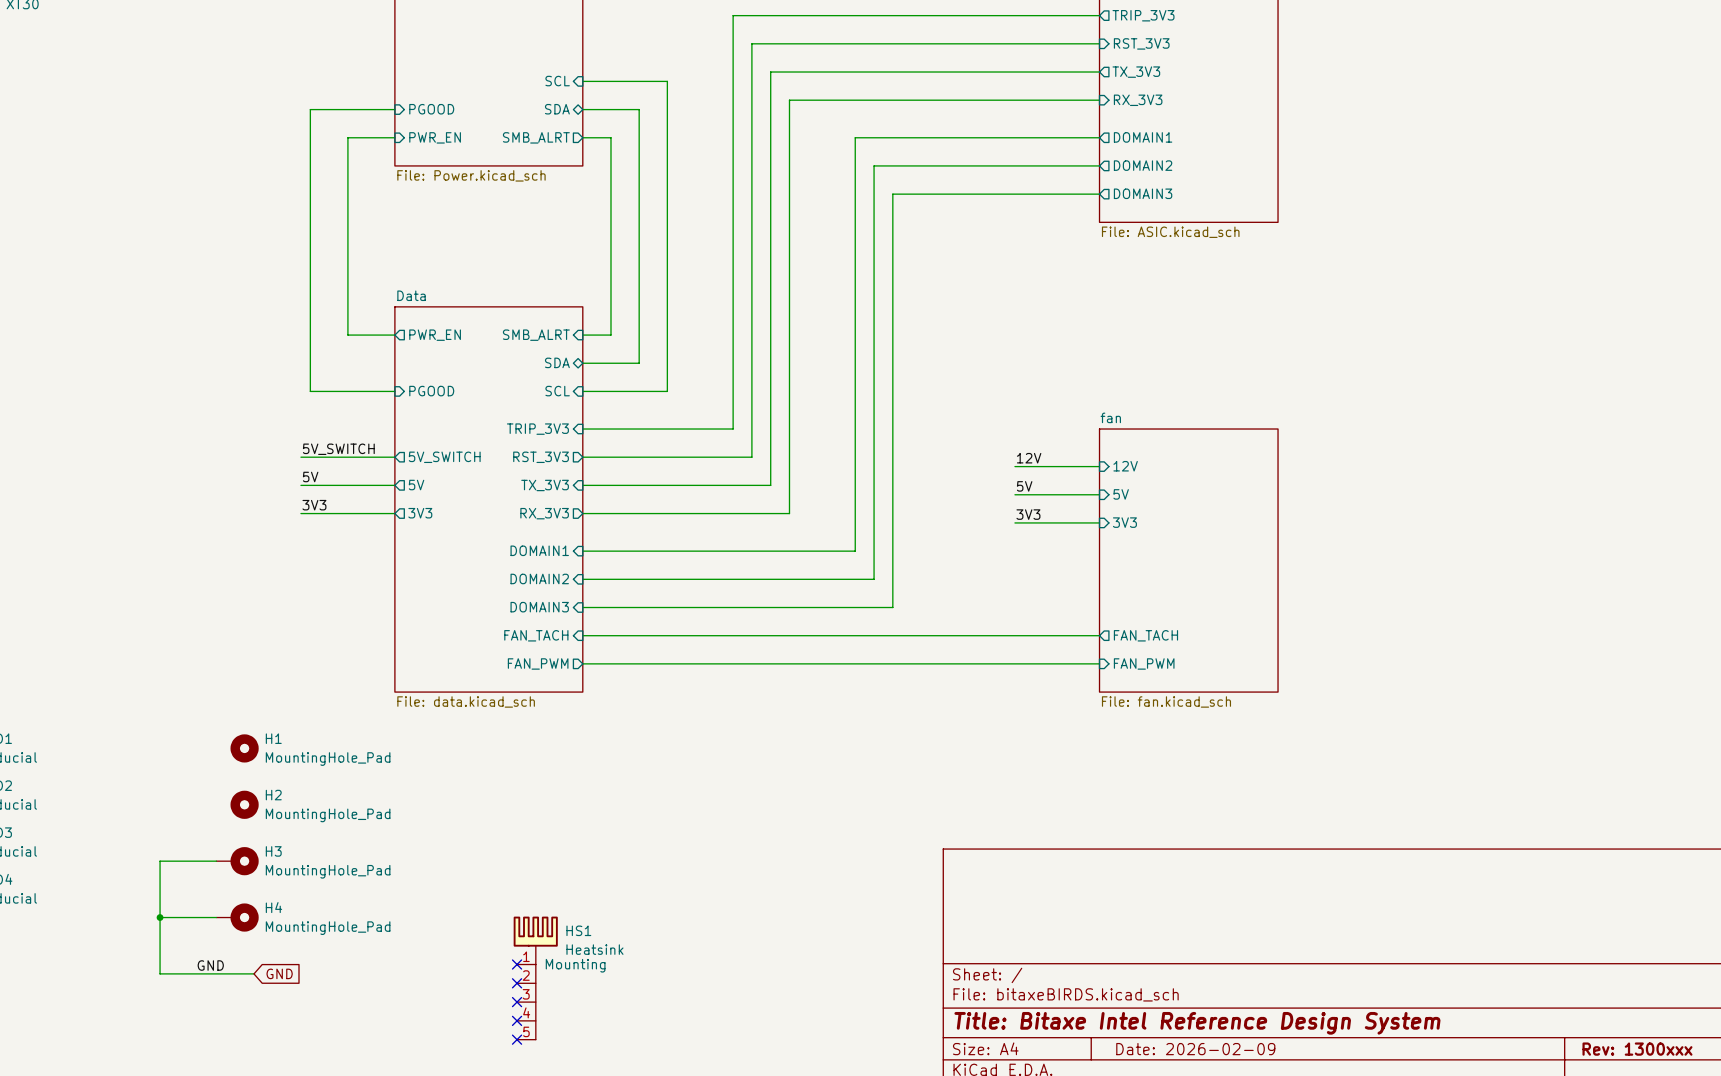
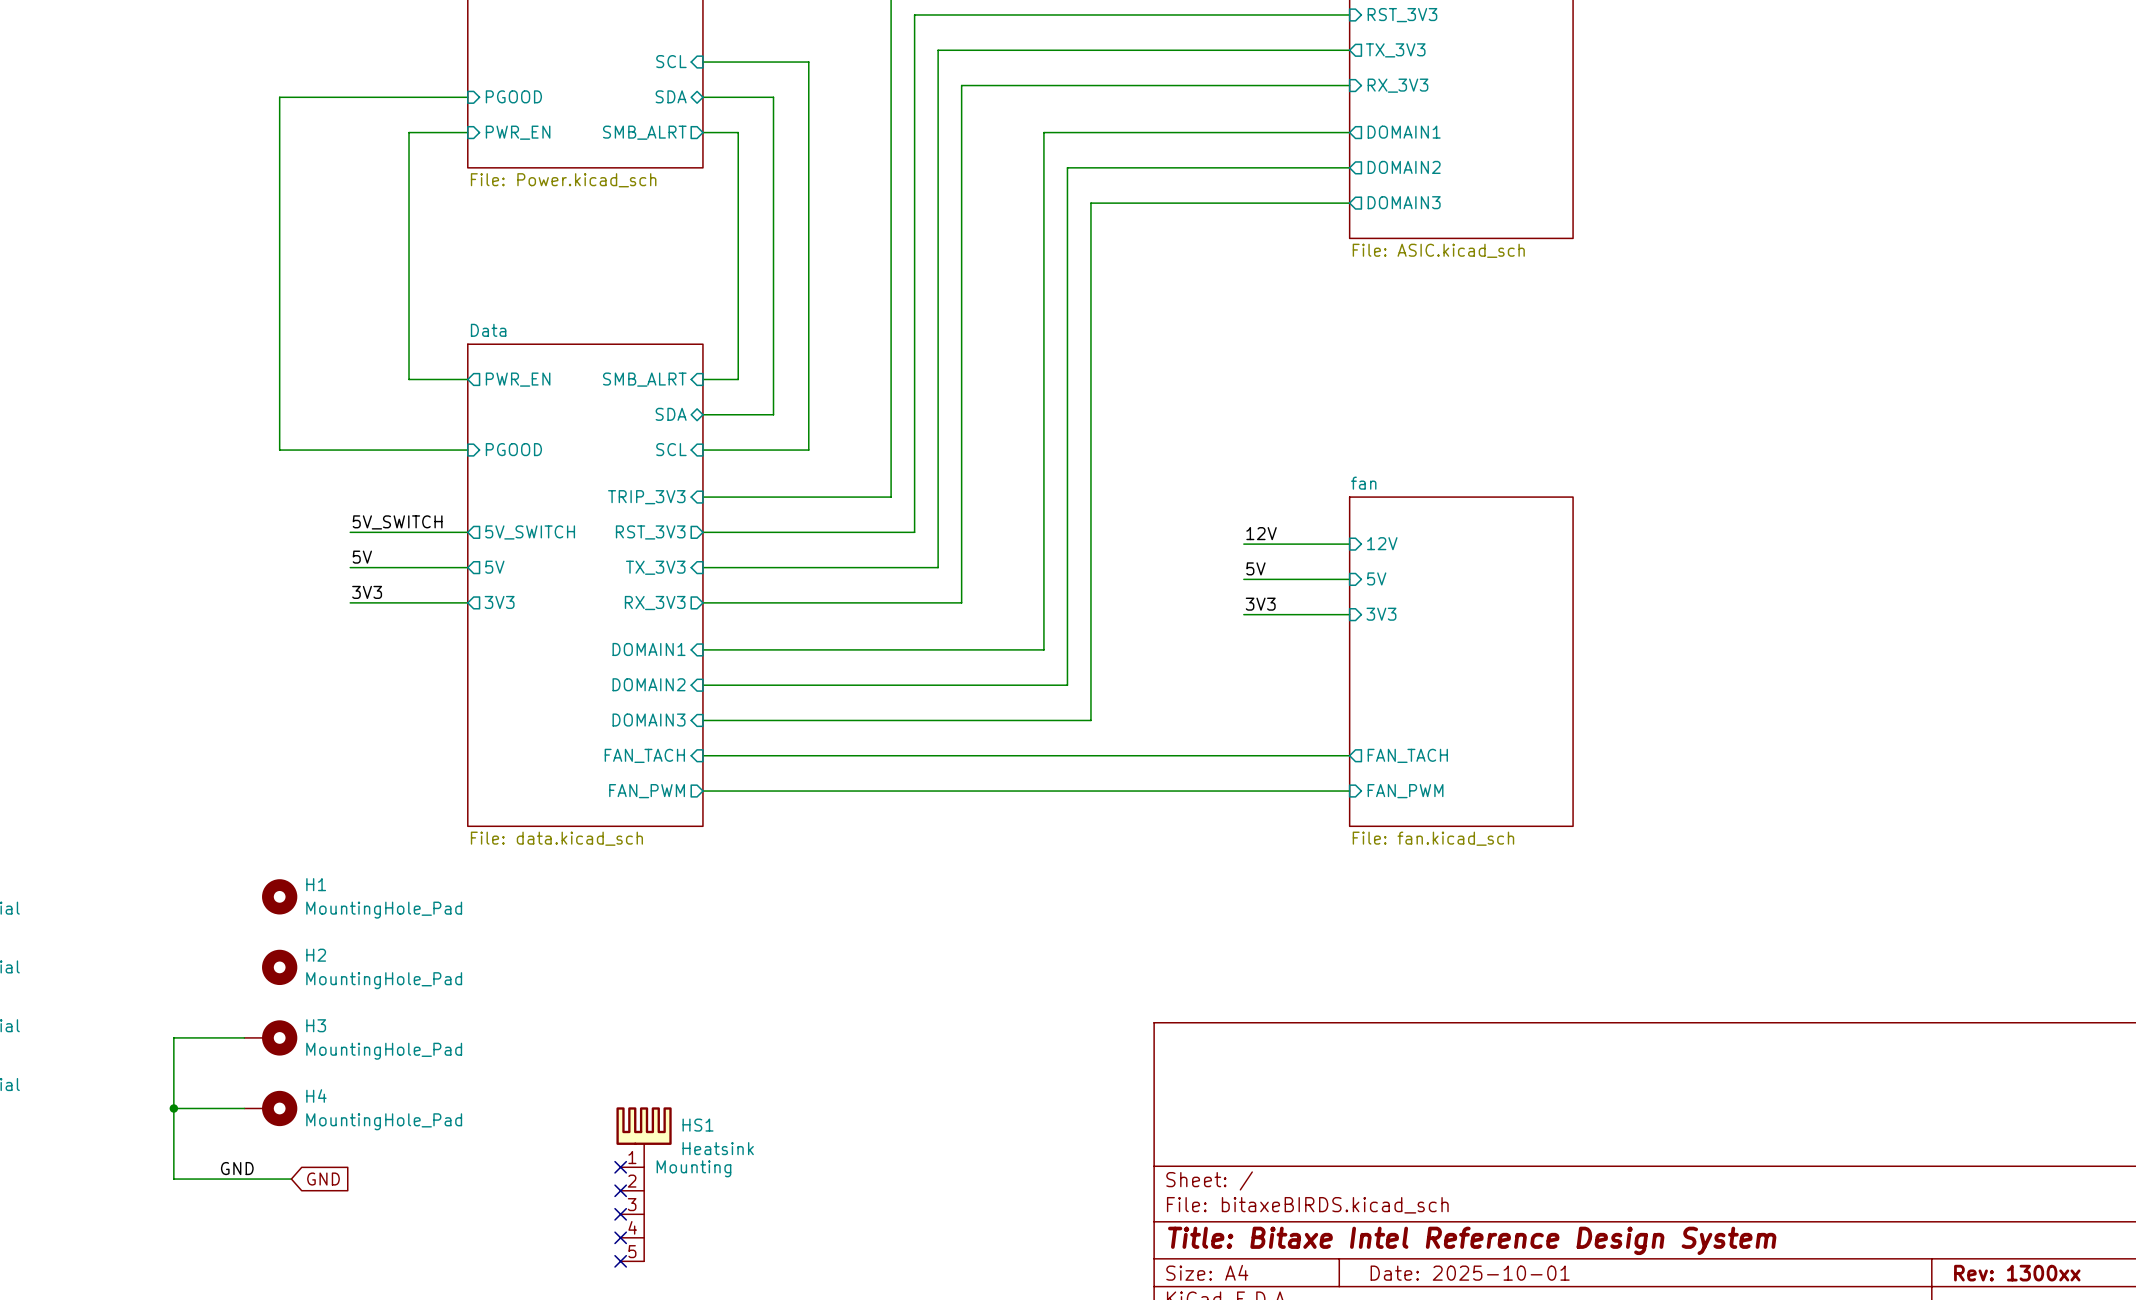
wire: (310, 109) (310, 391) -> (361, 97) (279, 97) (279, 450) (361, 450)
title block: Date: 2026-02-09 (1195, 1049) -> Date: 2025-10-01 (1470, 1273)
title block: Rev: 1300xxx (1637, 1049) -> Rev: 1300xx (2017, 1273)

